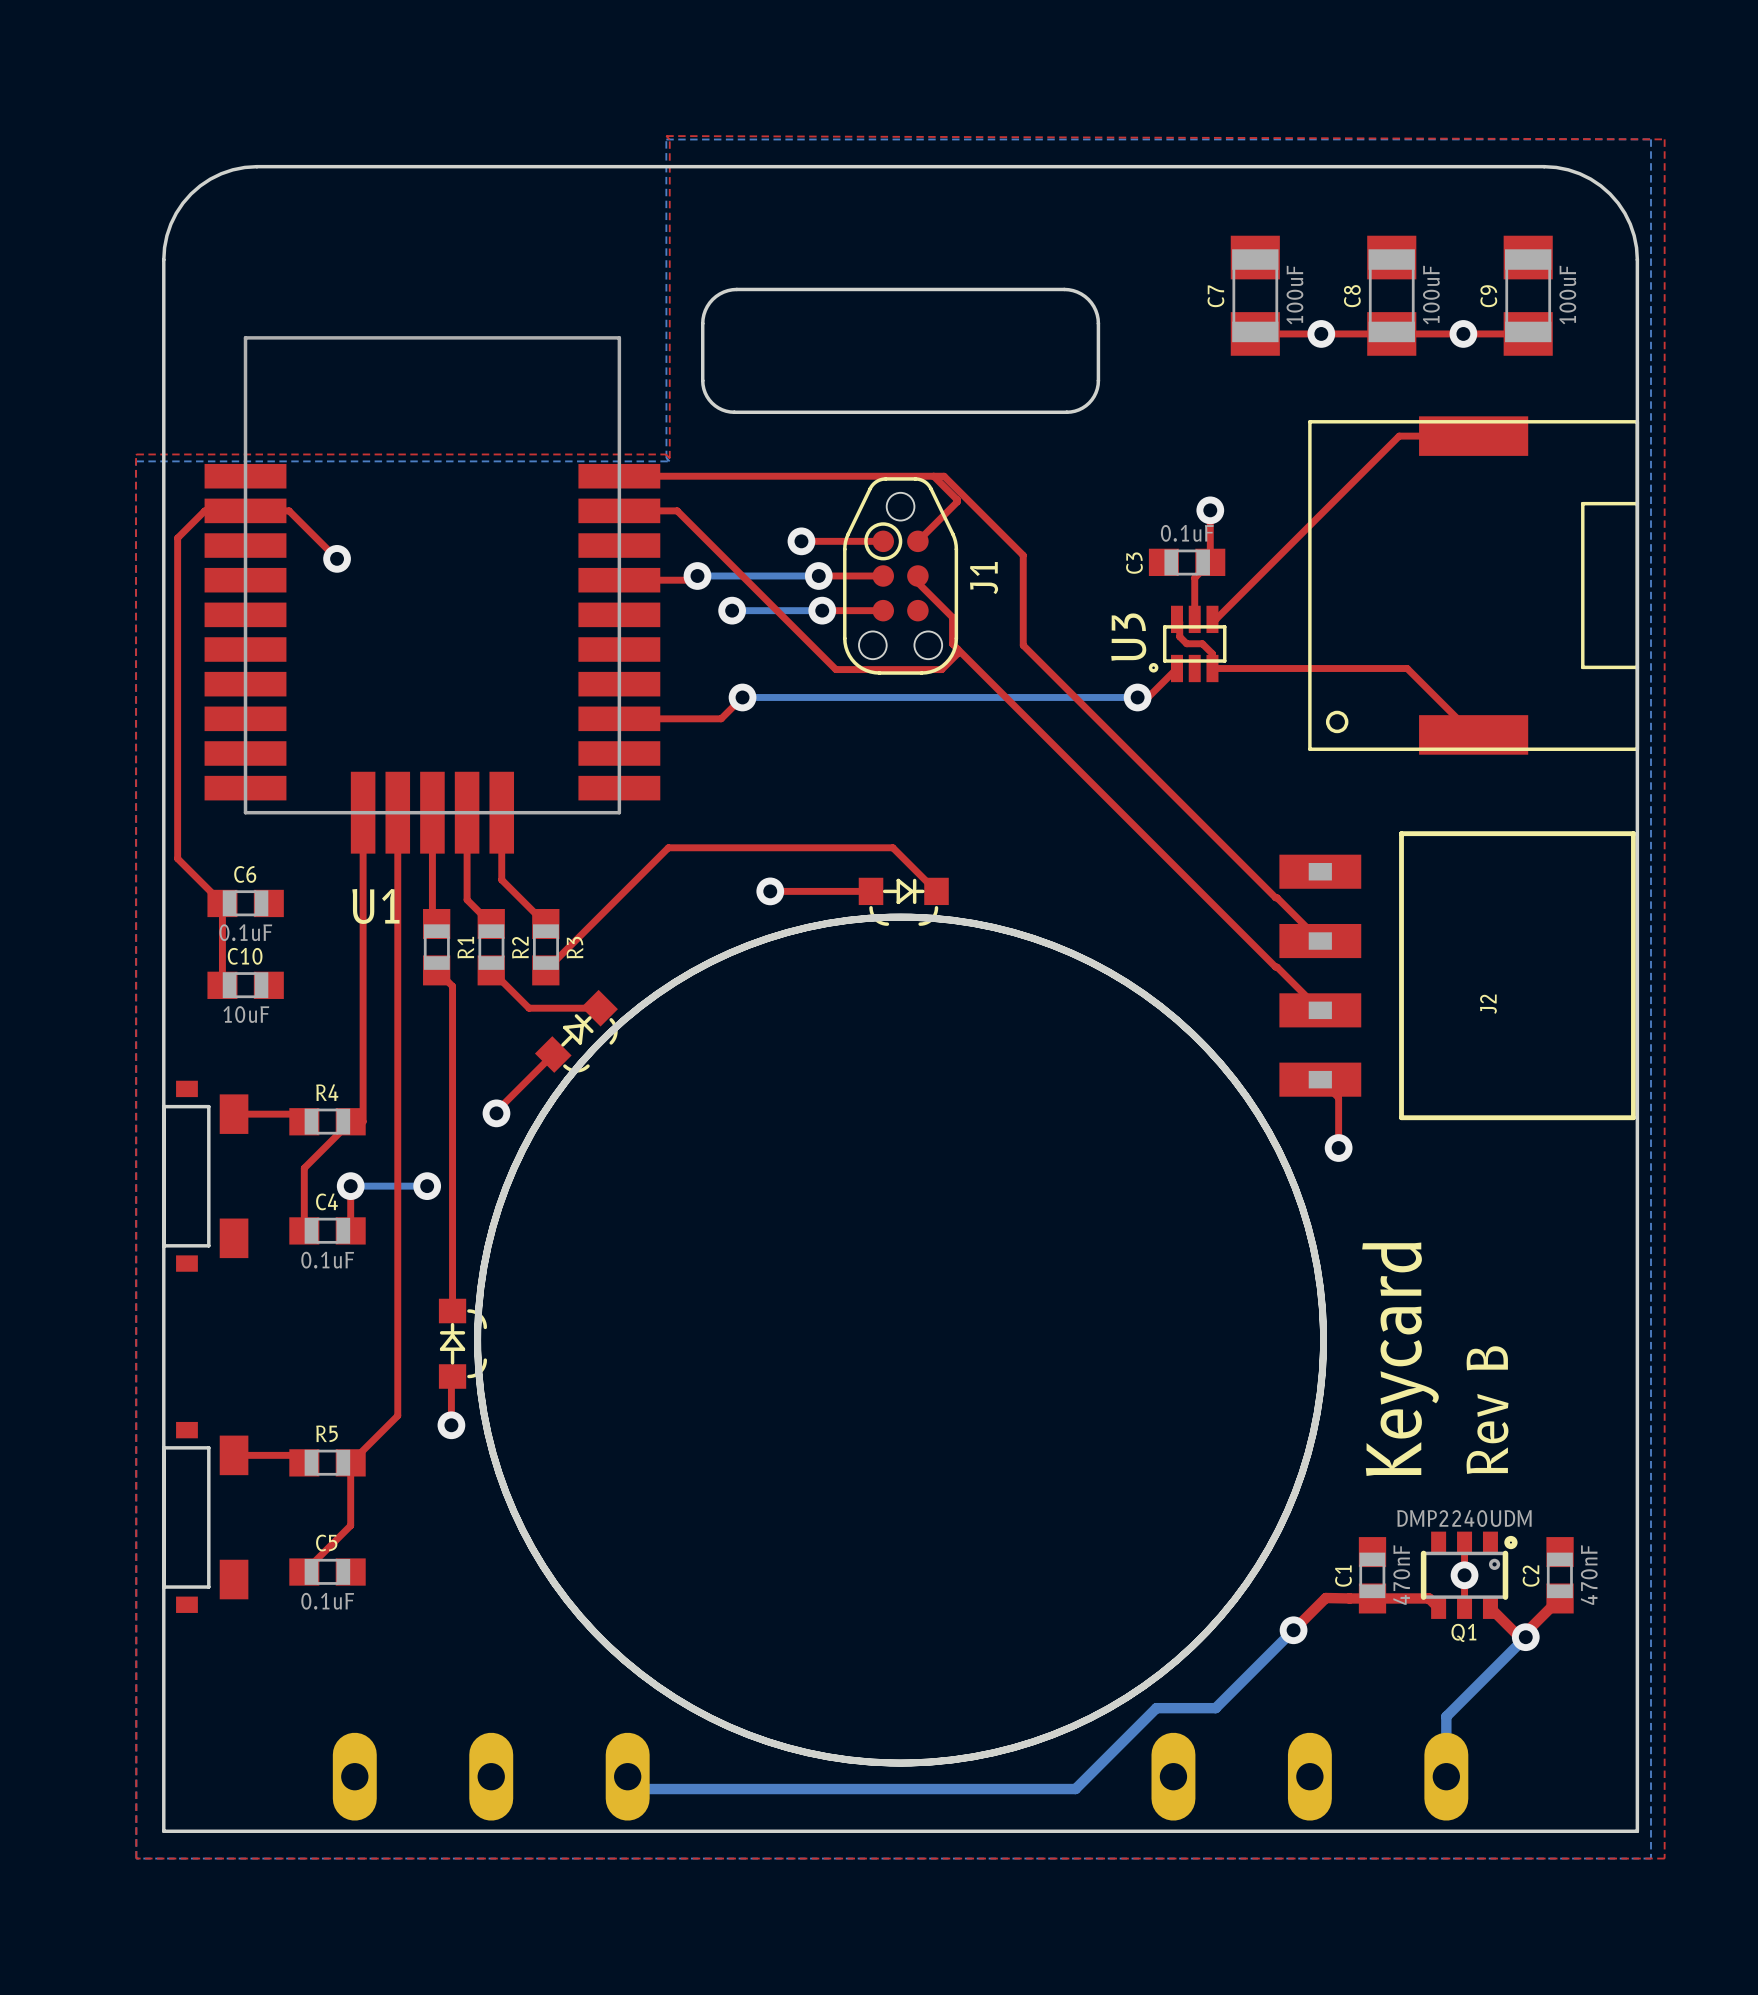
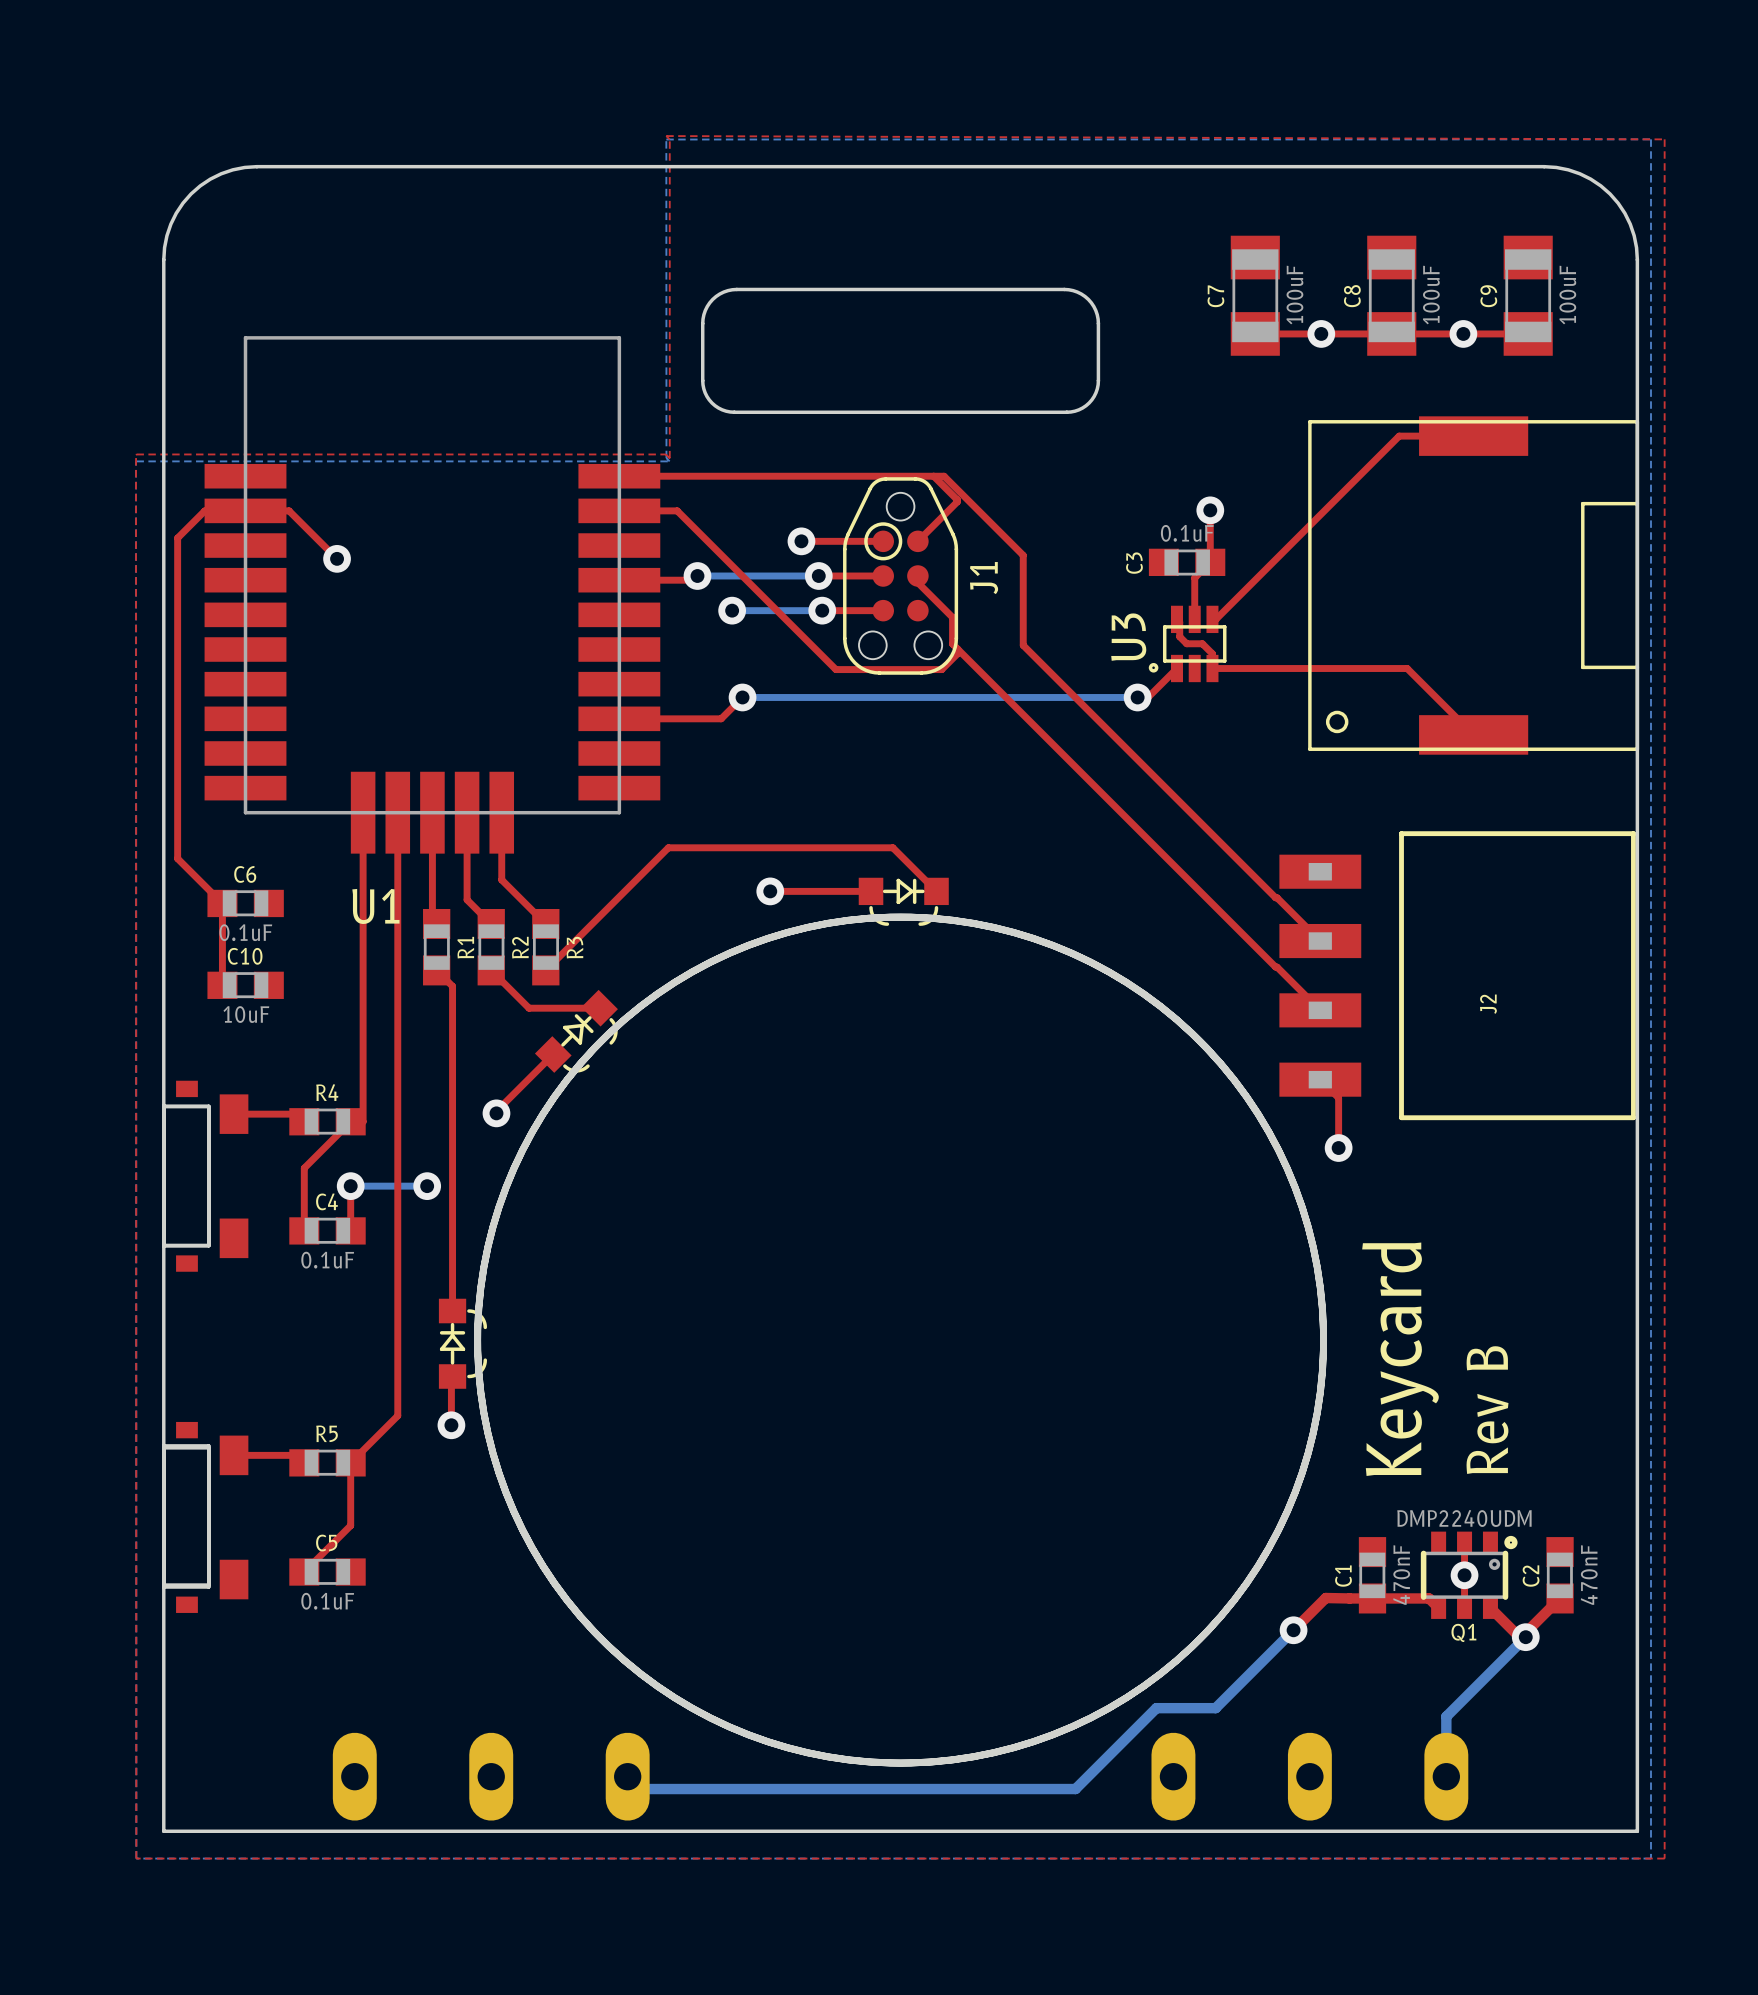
drawing shape: [162, 164, 1640, 1834] -> [162, 164, 1640, 1834]

